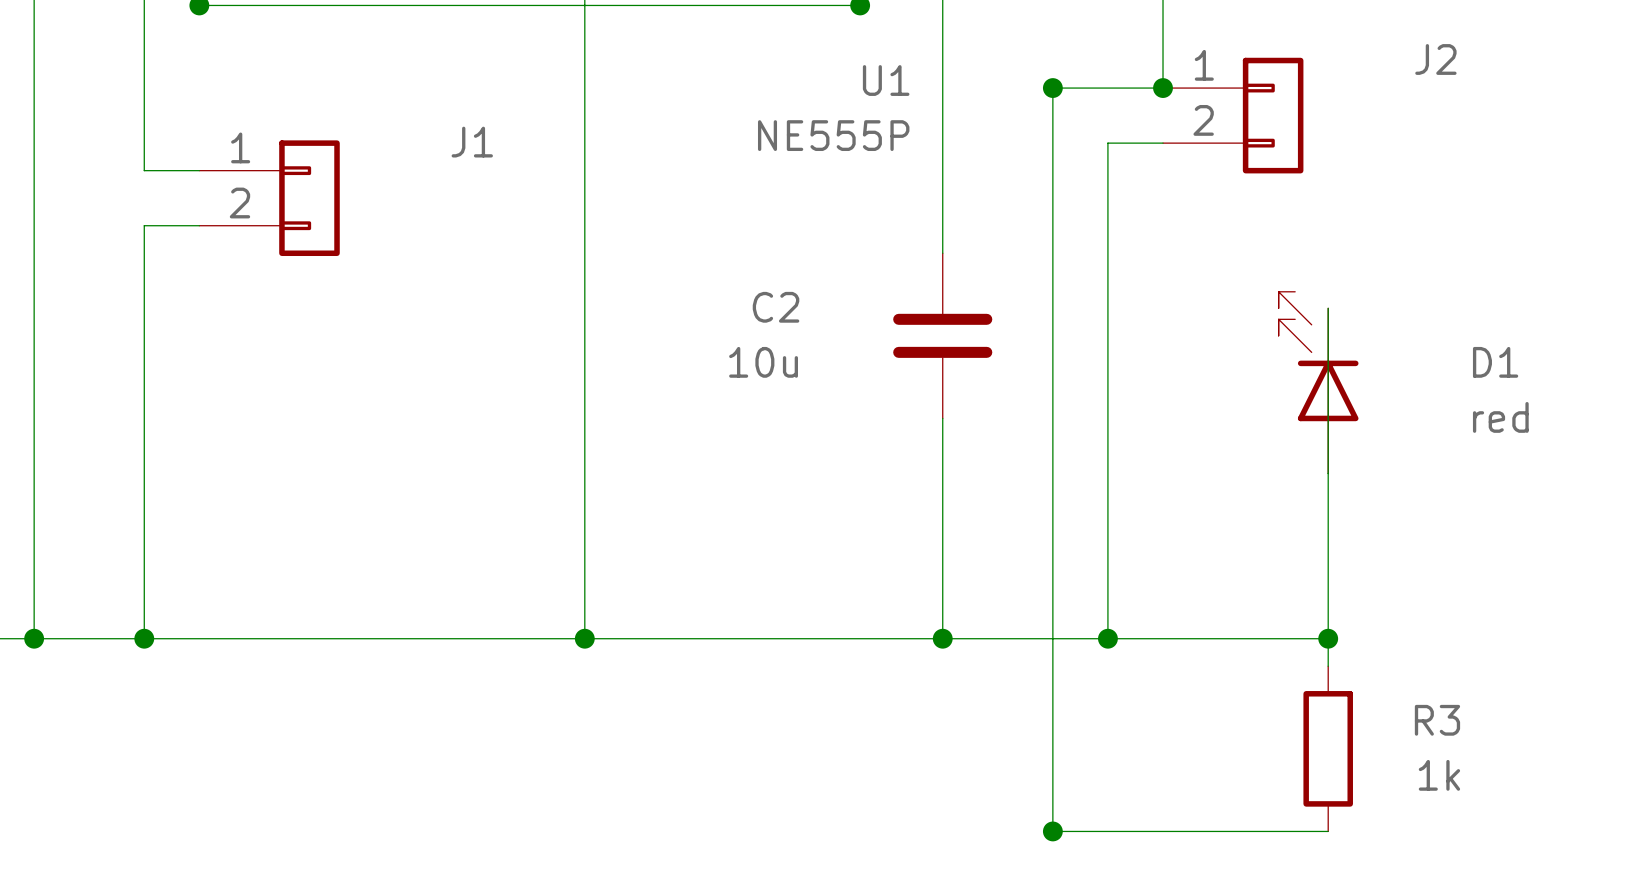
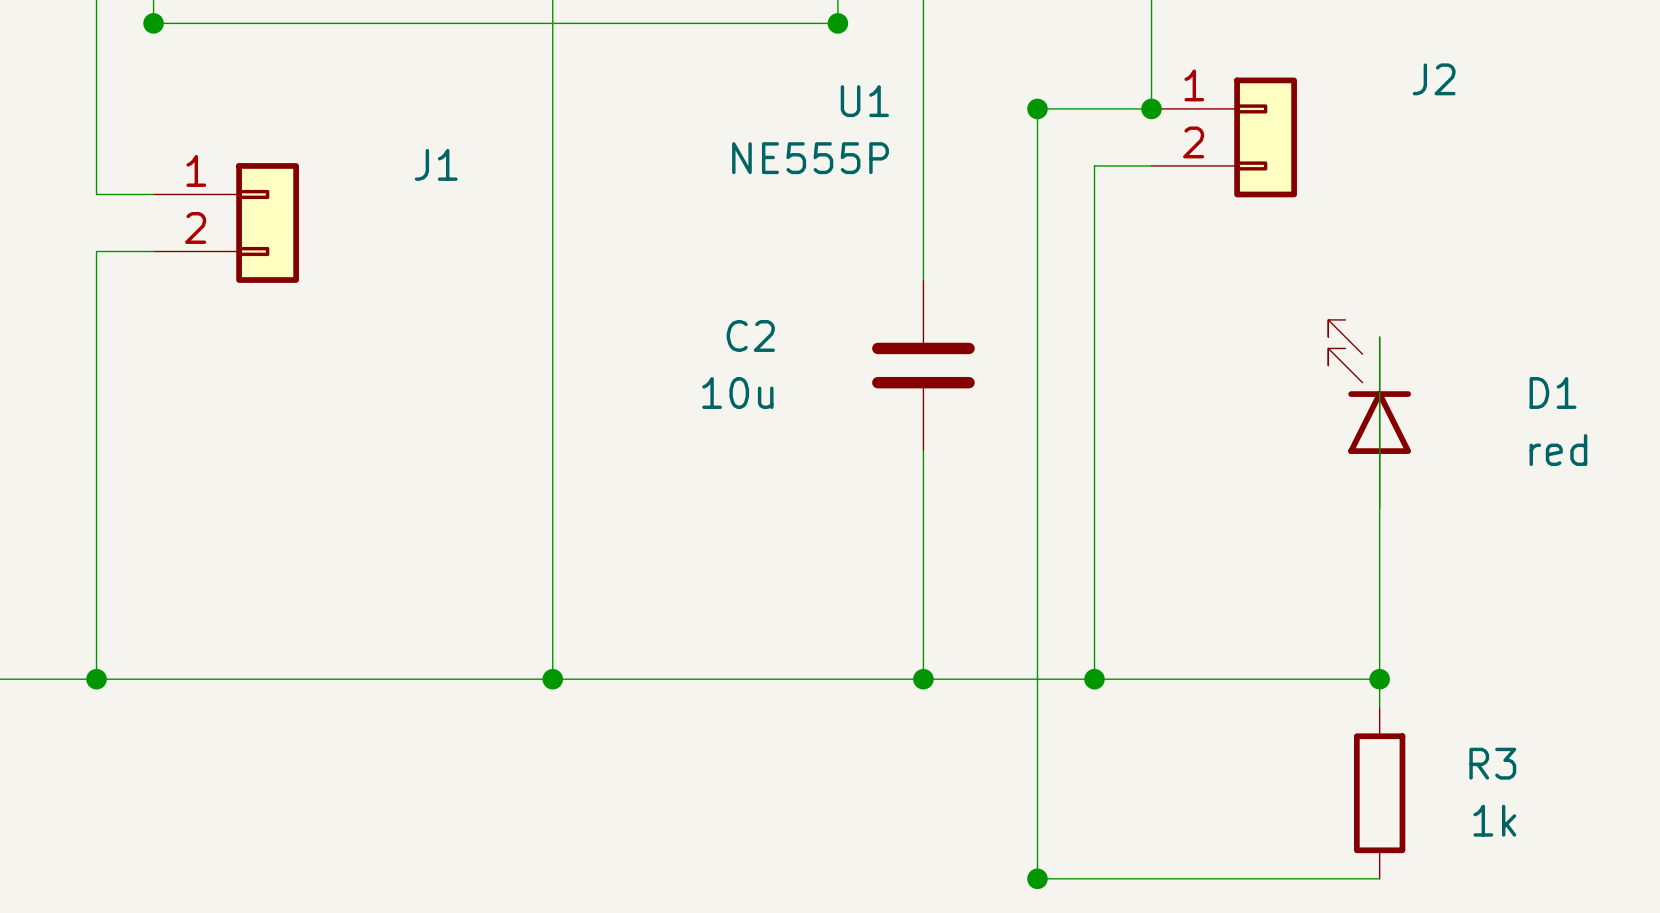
wire: (1328, 308) (1328, 666) -> (1379, 337) (1379, 707)
D1 position: (1318, 382) -> (1369, 414)
wire: none -> (1322, 679) (1379, 679)
junction position: (1328, 638) -> (1379, 679)
R3 position: (1328, 748) -> (1379, 793)
wire: none -> (1322, 878) (1379, 878)

